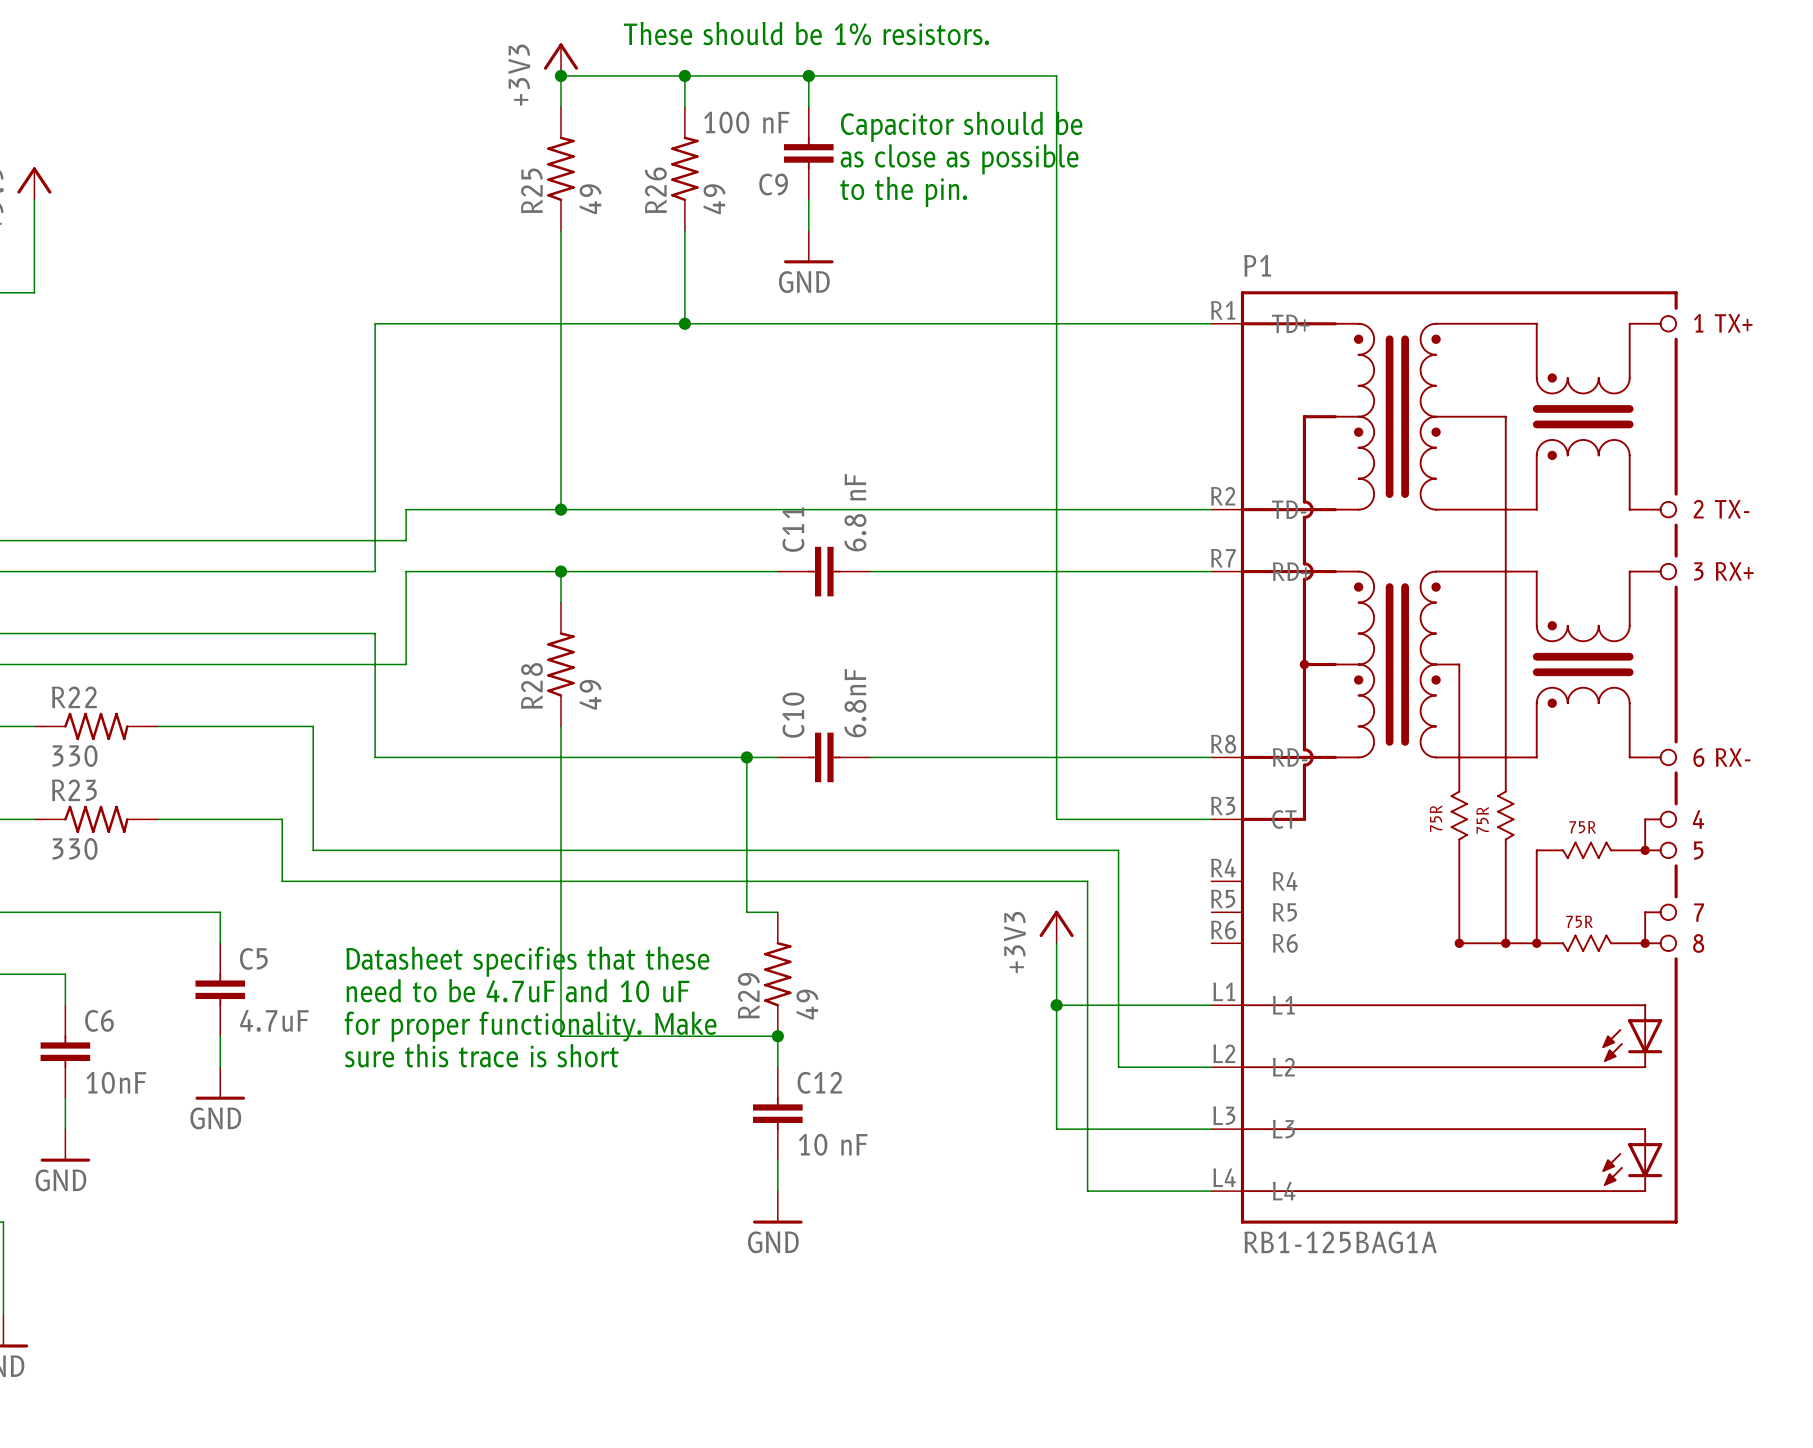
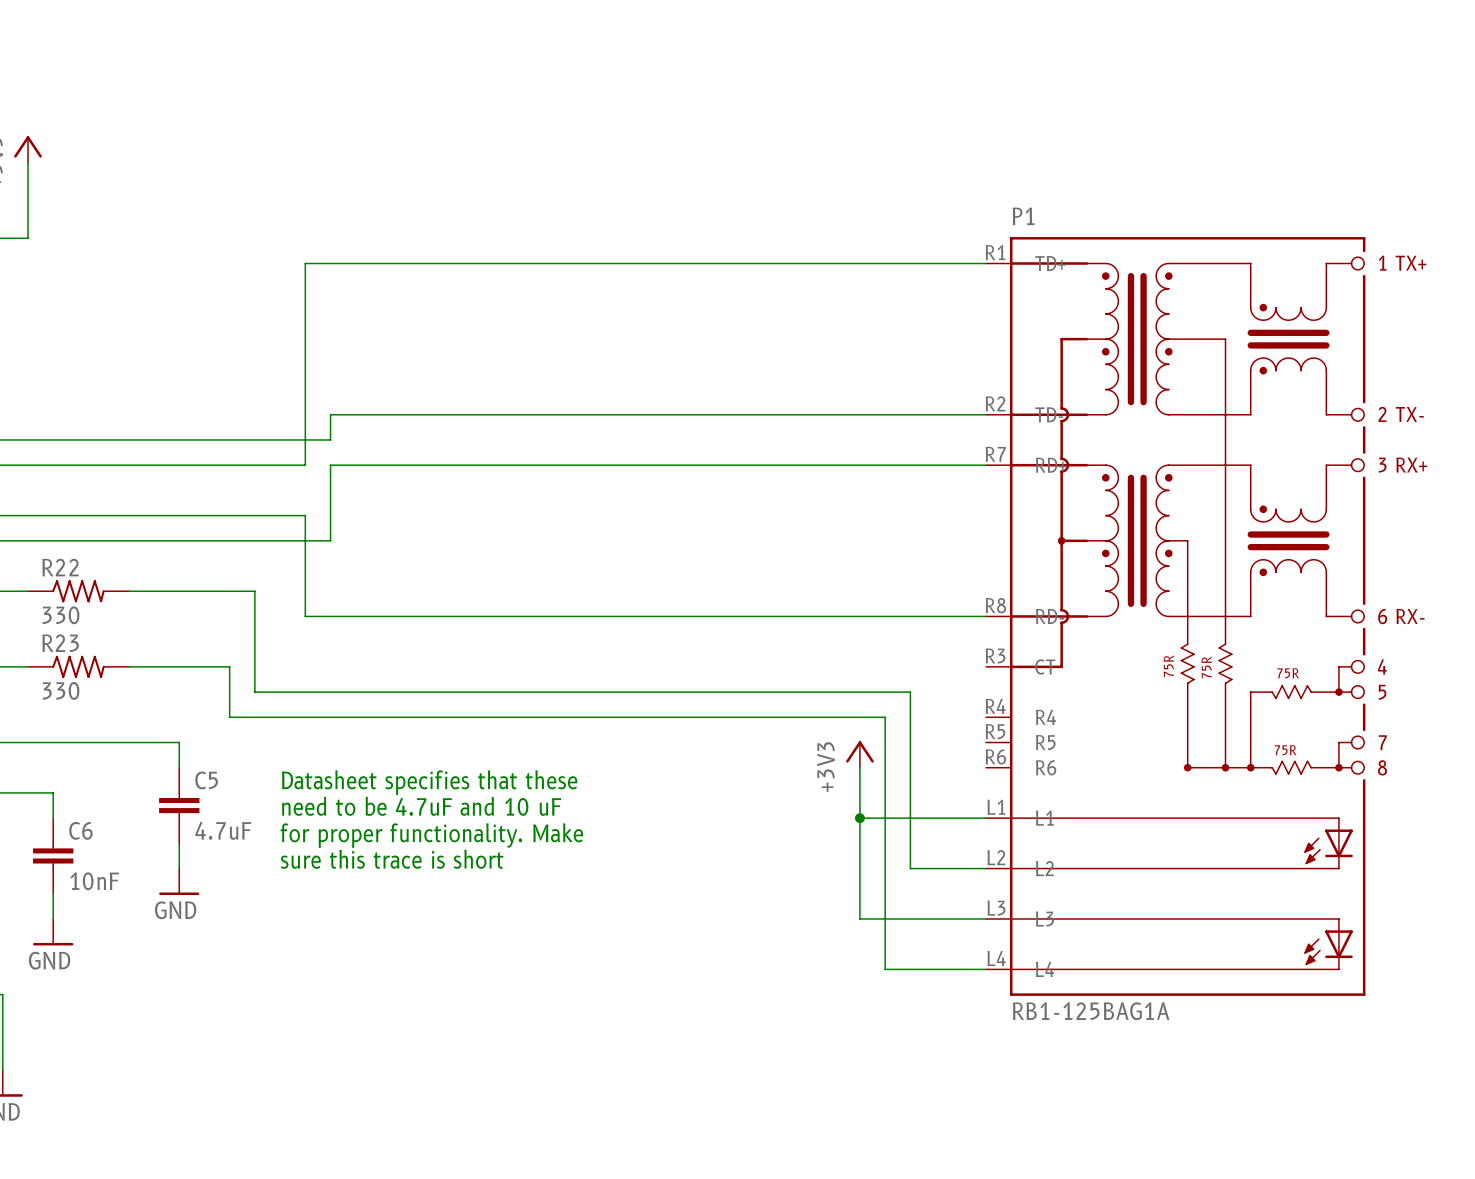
text: These should be 1% resistors. (806, 33) -> none
power symbol: +3V3 (560, 59) -> none
junction: (560, 75) -> none
wire: (684, 75) (684, 106) -> none
junction: (684, 75) -> none
wire: (808, 75) (808, 106) -> none
junction: (808, 75) -> none
wire: (560, 106) (560, 75) (1056, 75) (1056, 819) (1211, 819) -> none
text: Capacitor should be (961, 126) -> none
C9: 100 nF (808, 153) -> none
text: as close as possible (959, 159) -> none
R25: 49 (560, 168) -> none
R26: 49 (684, 168) -> none
text: to the pin. (903, 191) -> none
wire: (808, 199) (808, 230) -> none
wire: (560, 230) (560, 509) -> none
wire: (684, 230) (684, 323) -> none
power symbol: GND (808, 247) -> none
junction: (684, 323) -> none
junction: (560, 509) -> none
wire: (560, 571) (560, 602) -> none
junction: (560, 571) -> none
C11: 6.8 nF (824, 571) -> none
R28: 49 (560, 664) -> none
wire: (560, 726) (560, 1036) (777, 1036) (777, 1067) -> none
wire: (746, 757) (746, 912) (777, 912) -> none
junction: (746, 757) -> none
C10: 6.8nF (824, 757) -> none
R29: 49 (777, 974) -> none
junction: (777, 1036) -> none
C12: 10 nF (777, 1113) -> none
wire: (777, 1160) (777, 1191) -> none
power symbol: GND (777, 1207) -> none

